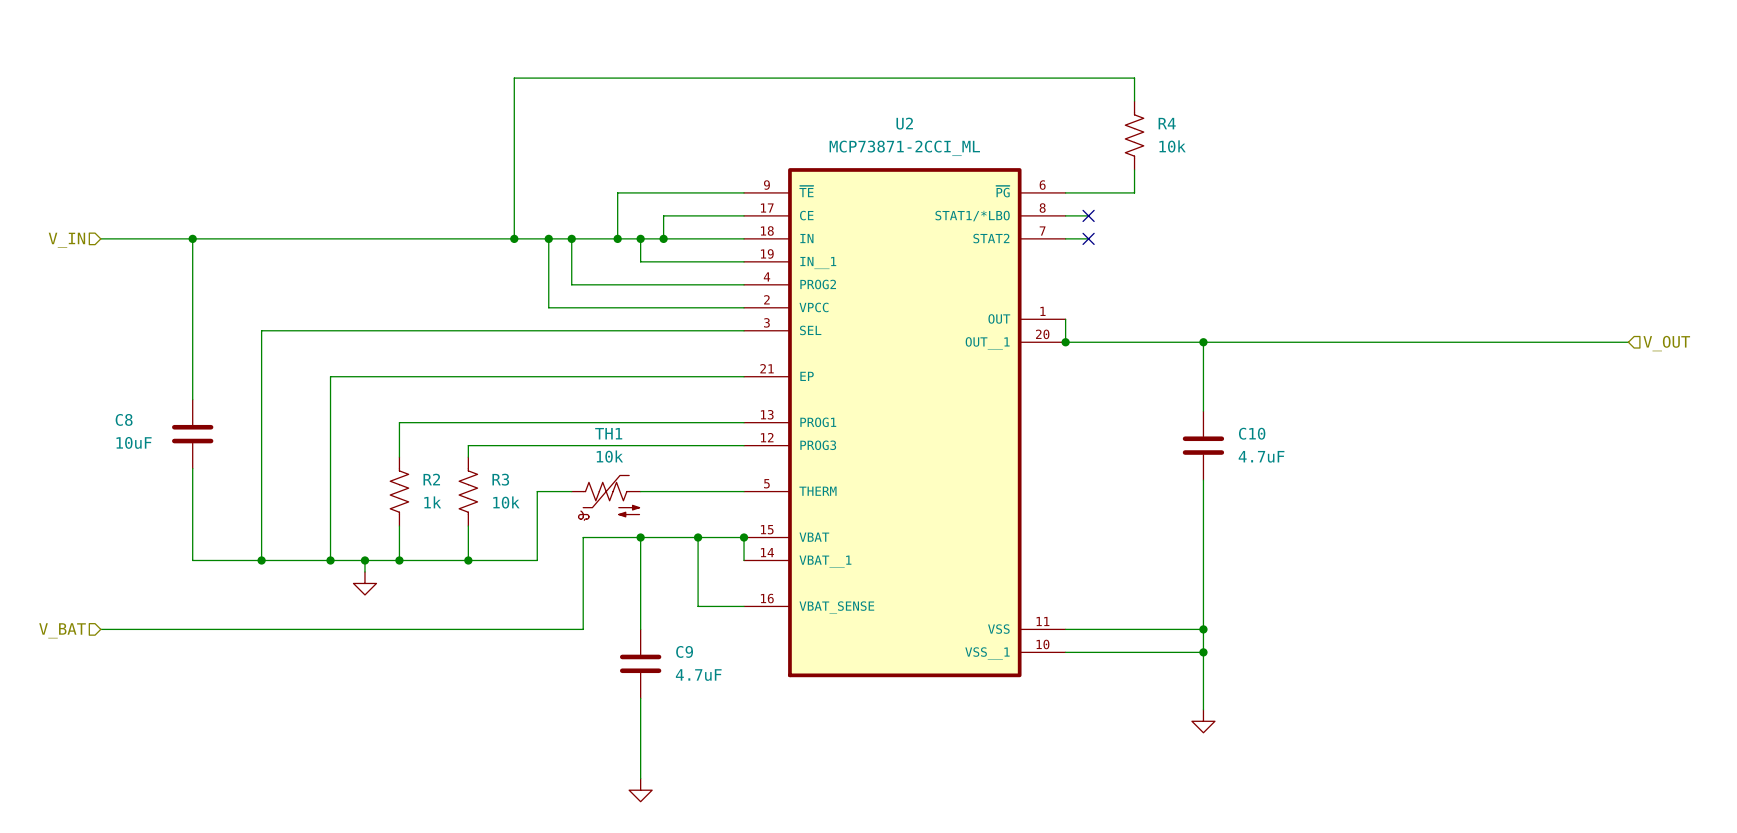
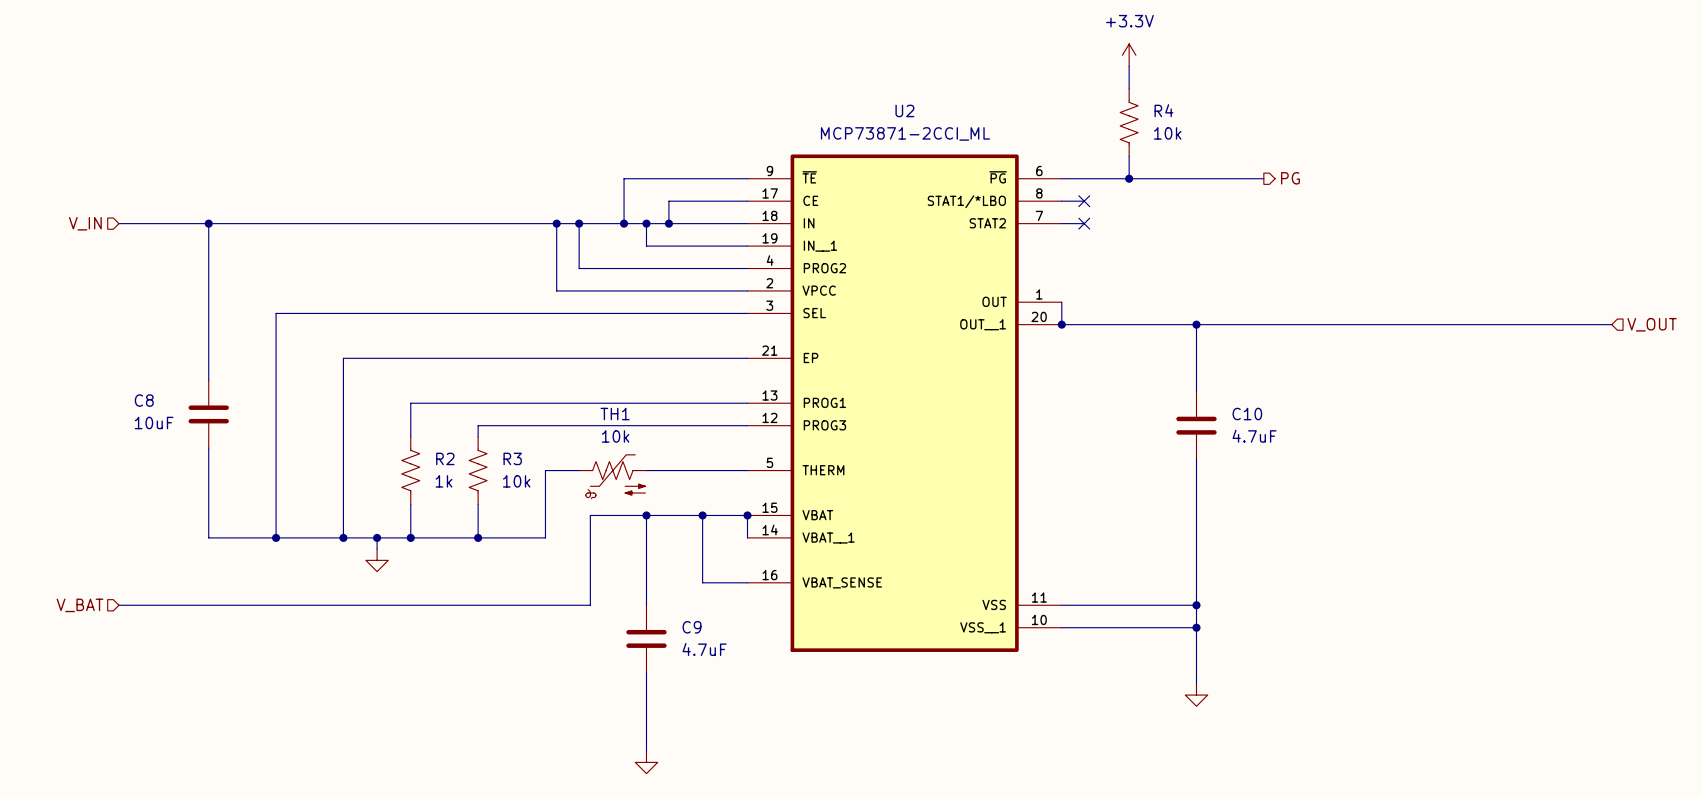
power symbol: none -> +3.3V (1129, 55)
wire: (1134, 78) (514, 78) (514, 238) -> none
wire: none -> (1129, 178) (1263, 178)
junction: none -> (1129, 178)
hierarchical label: none -> PG (1290, 178)
junction: (514, 238) -> none

